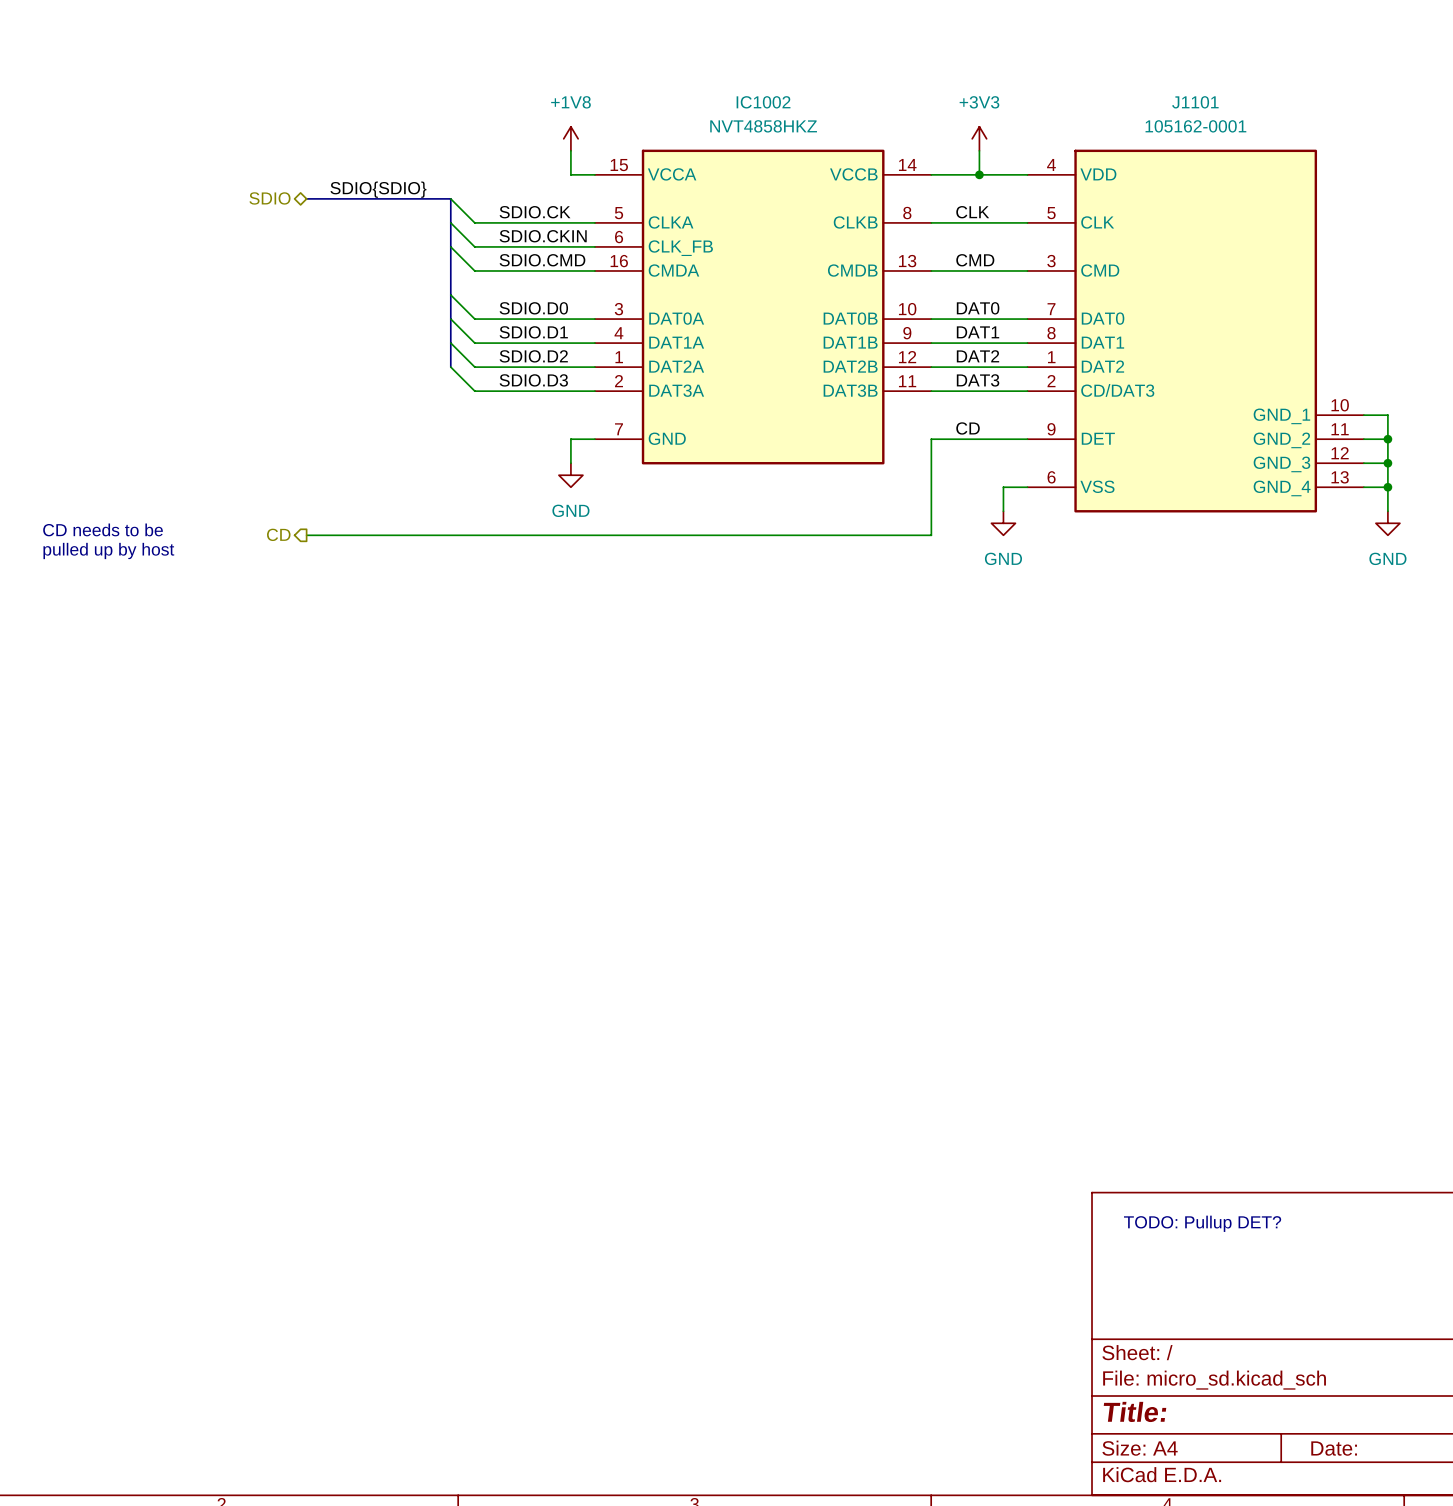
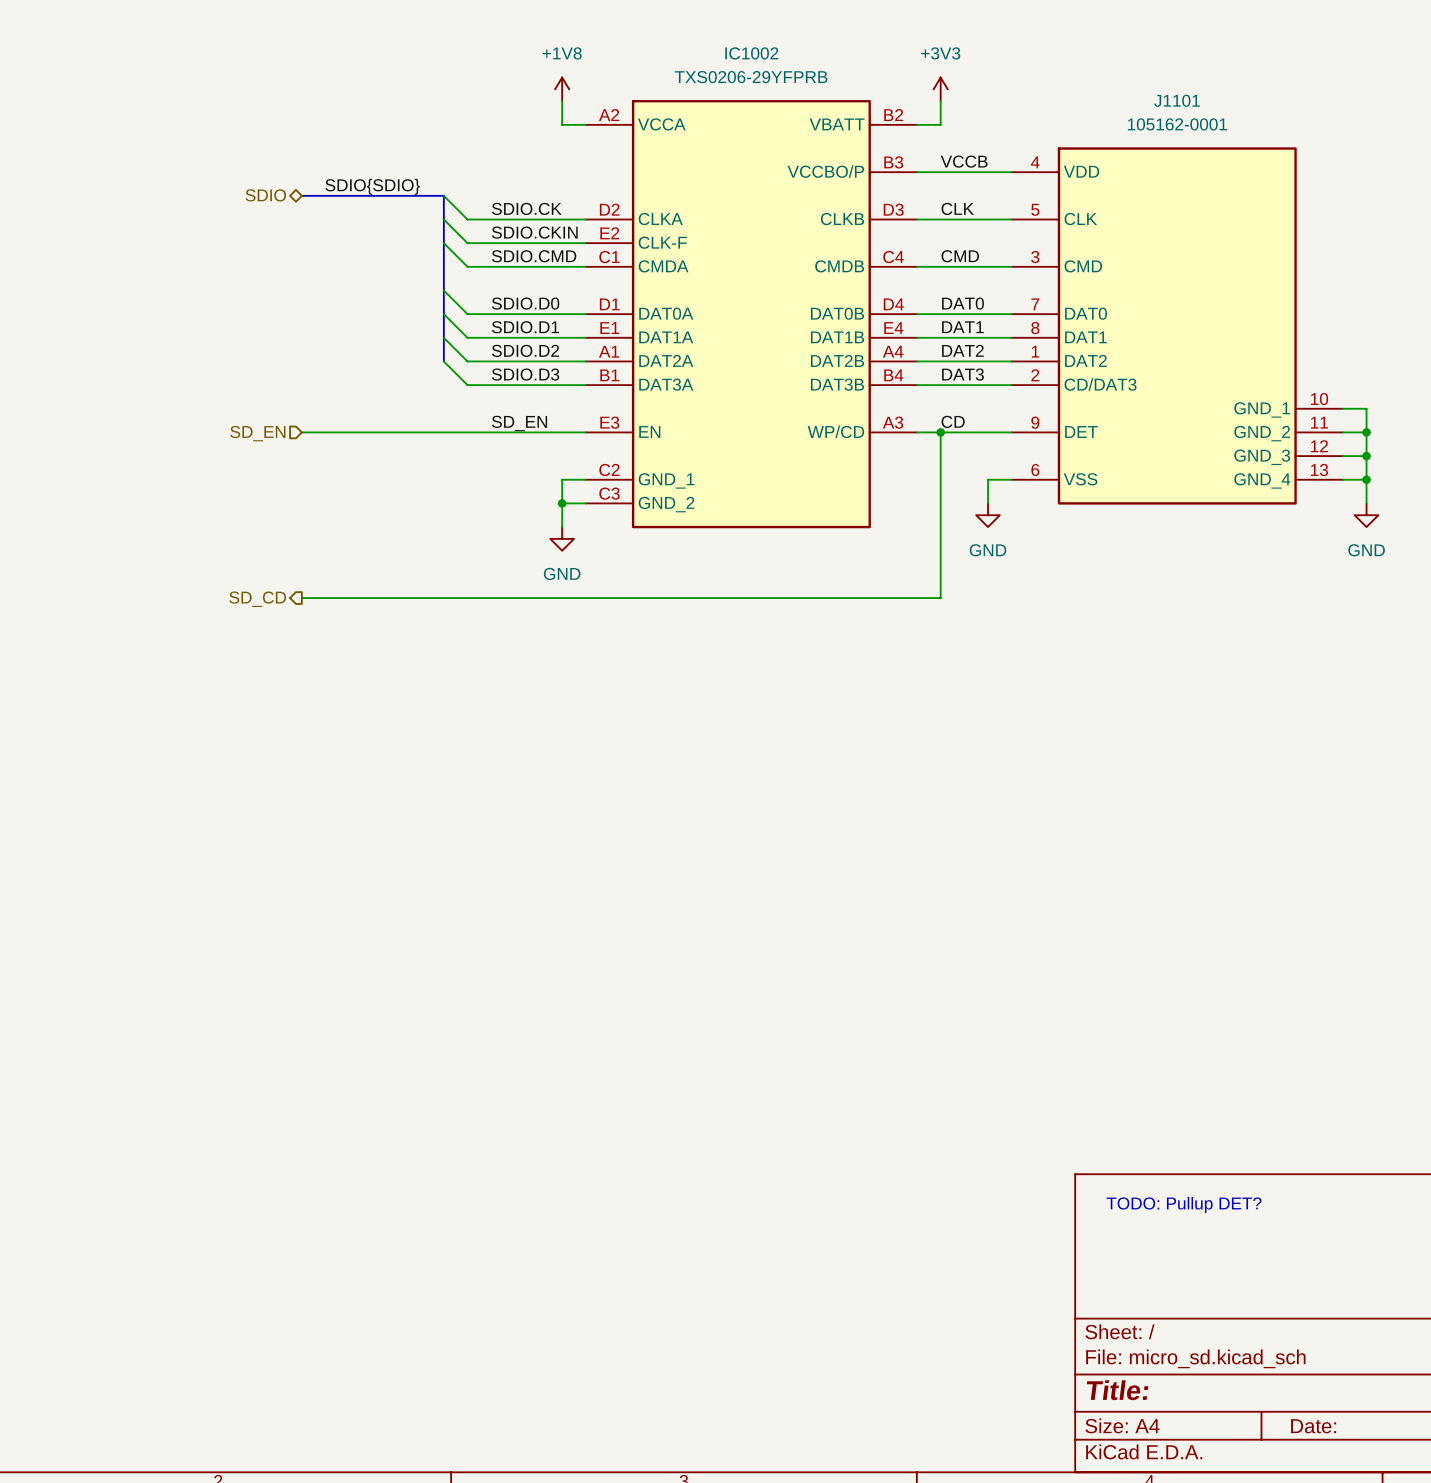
IC1002 name position: IC1002 (763, 102) -> IC1002 (751, 53)
wire: none -> (940, 101) (940, 124) (917, 124)
IC1002 value: NVT4858HKZ (763, 126) -> TXS0206-29YFPRB (751, 77)
power symbol position: +1V8 (570, 138) -> +1V8 (562, 89)
power symbol position: +3V3 (979, 138) -> +3V3 (940, 89)
IC1002 symbol: [594, 149, 932, 465] -> [585, 100, 918, 529]
wire: (570, 150) (570, 174) (594, 174) -> (562, 101) (562, 124) (585, 124)
wire: (979, 150) (979, 174) -> none
label: none -> VCCB (964, 161)
junction: (979, 174) -> none
label: none -> SD_EN (519, 423)
wire: (570, 439) (570, 463) -> (562, 432) (301, 432)
wire: (931, 439) (931, 535) (306, 535) -> none
wire: none -> (940, 432) (940, 598) (301, 598)
junction: none -> (940, 432)
hierarchical label: none -> SD_EN (257, 433)
power symbol position: GND (570, 475) -> GND (562, 538)
wire: none -> (585, 479) (562, 479) (562, 527)
wire: none -> (562, 503) (585, 503)
junction: none -> (562, 503)
text: CD needs to be (103, 529) -> none
hierarchical label: CD (278, 534) -> none
text: pulled up by host (108, 550) -> none
hierarchical label: none -> SD_CD (257, 599)

